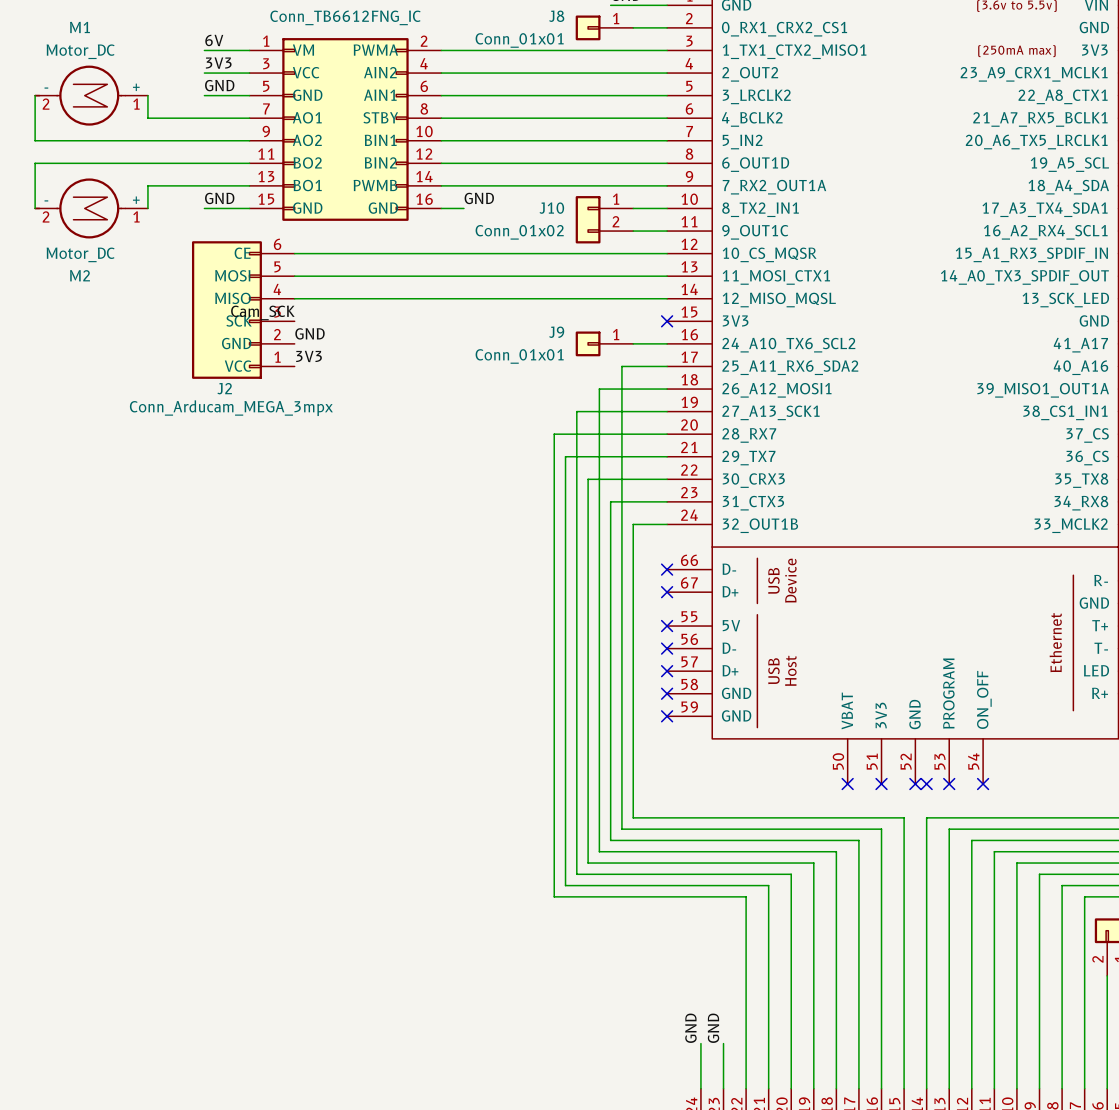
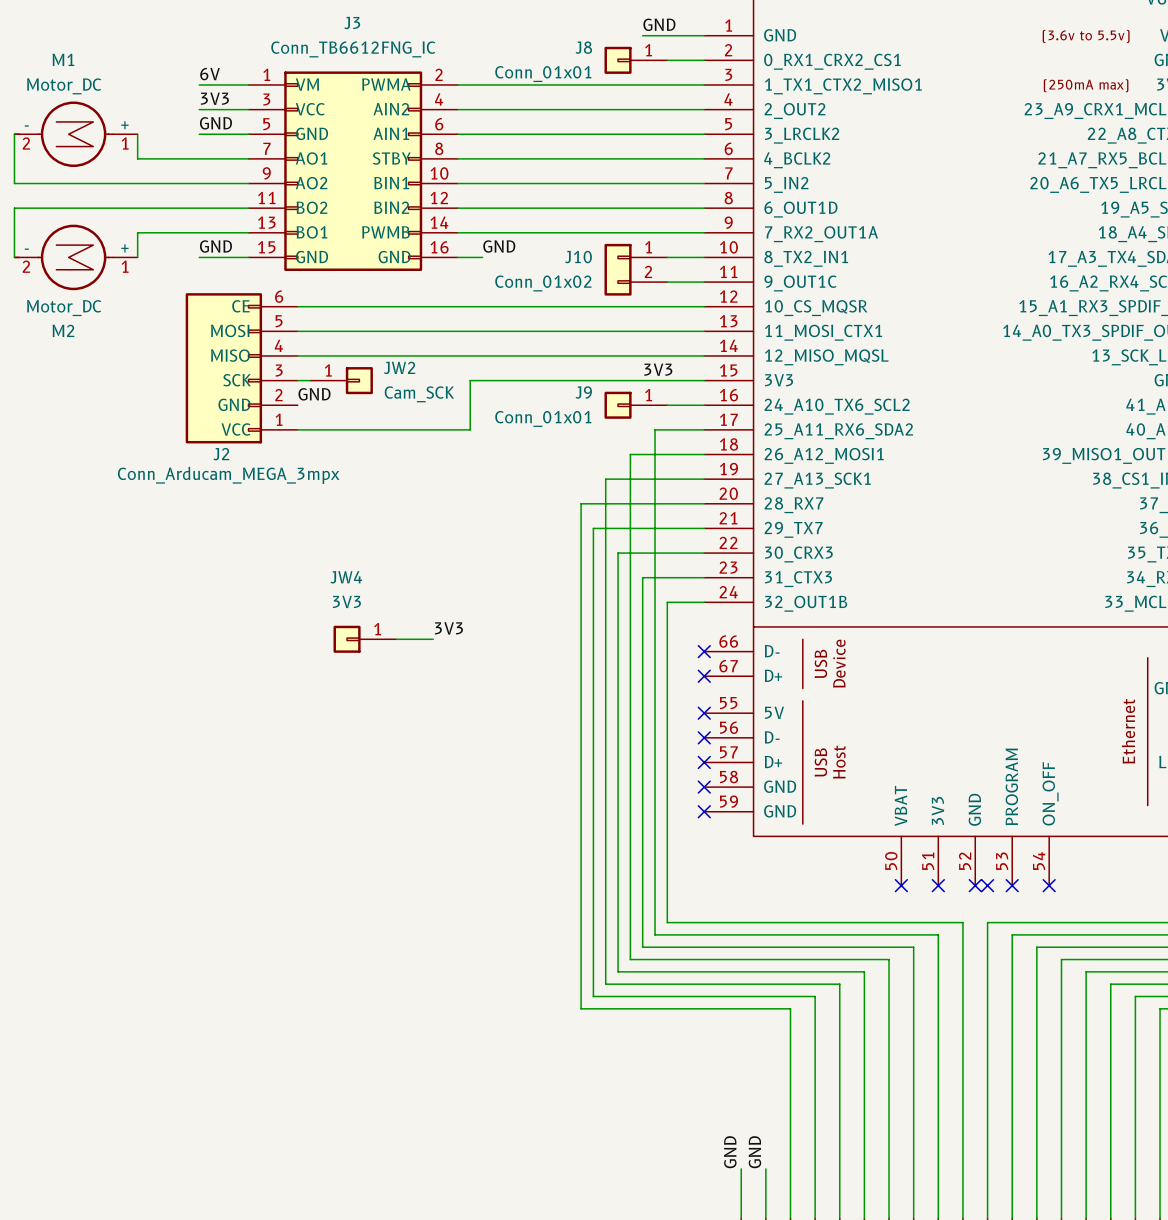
label: none -> 3V3 (658, 369)
label: Cam_SCK (262, 312) -> none
wire: none -> (297, 380) (310, 380)
JW2: none -> Cam_SCK (341, 380)
wire: none -> (704, 380) (470, 380) (470, 429) (297, 429)
no-connect mark: (667, 321) -> none
label: 3V3 (309, 356) -> none
label: none -> 3V3 (448, 628)
JW4: none -> 3V3 (364, 639)
wire: none -> (396, 639) (433, 639)

